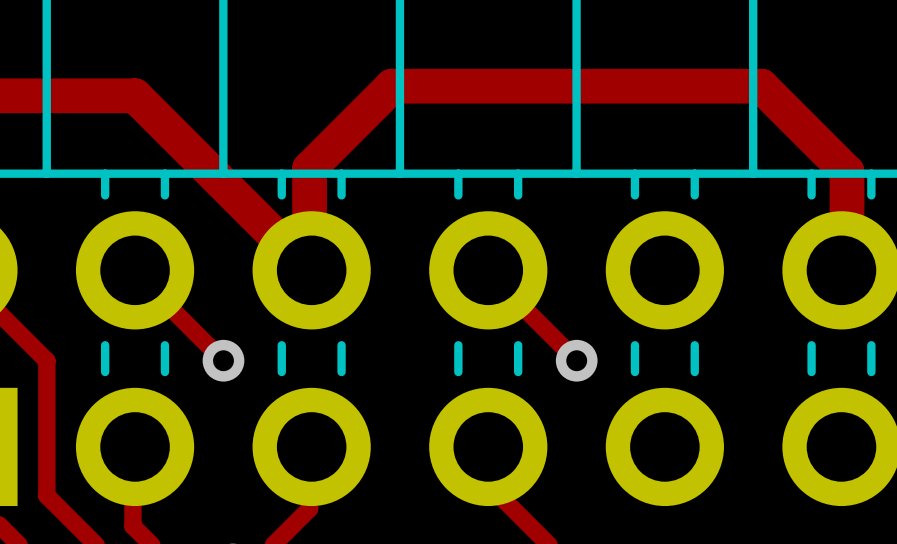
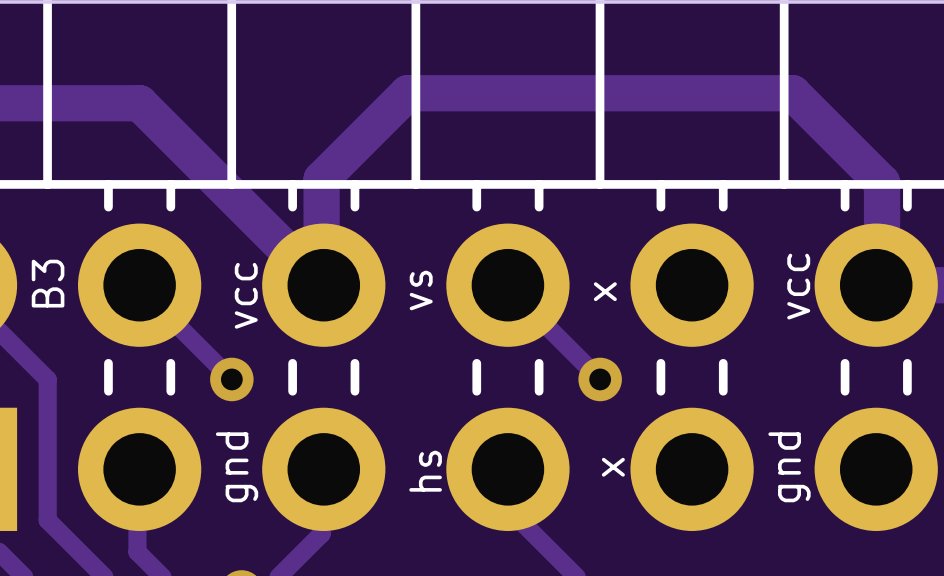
text: none -> B3 (48, 283)
text: none -> vcc (798, 286)
text: none -> vs (421, 290)
text: none -> x (605, 291)
text: none -> vcc (246, 295)
text: none -> x (613, 467)
text: none -> gnd (237, 467)
text: none -> gnd (789, 467)
text: none -> hs (425, 471)

